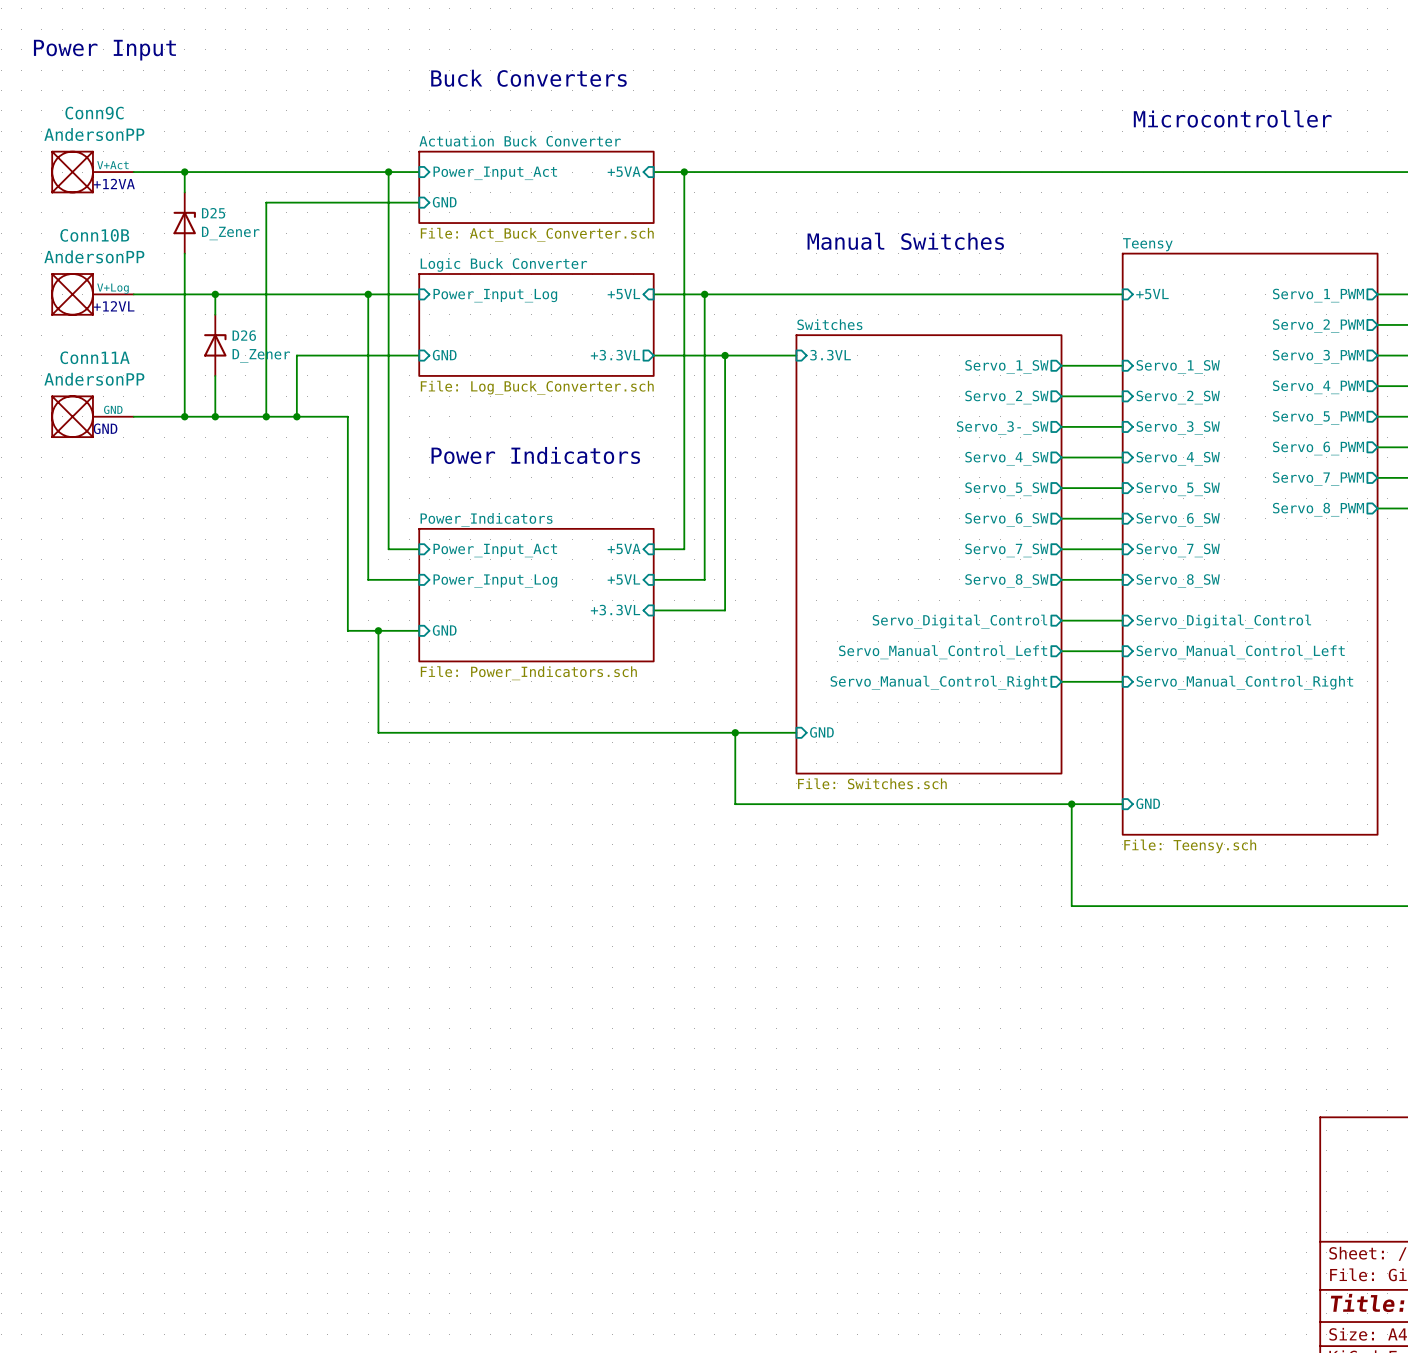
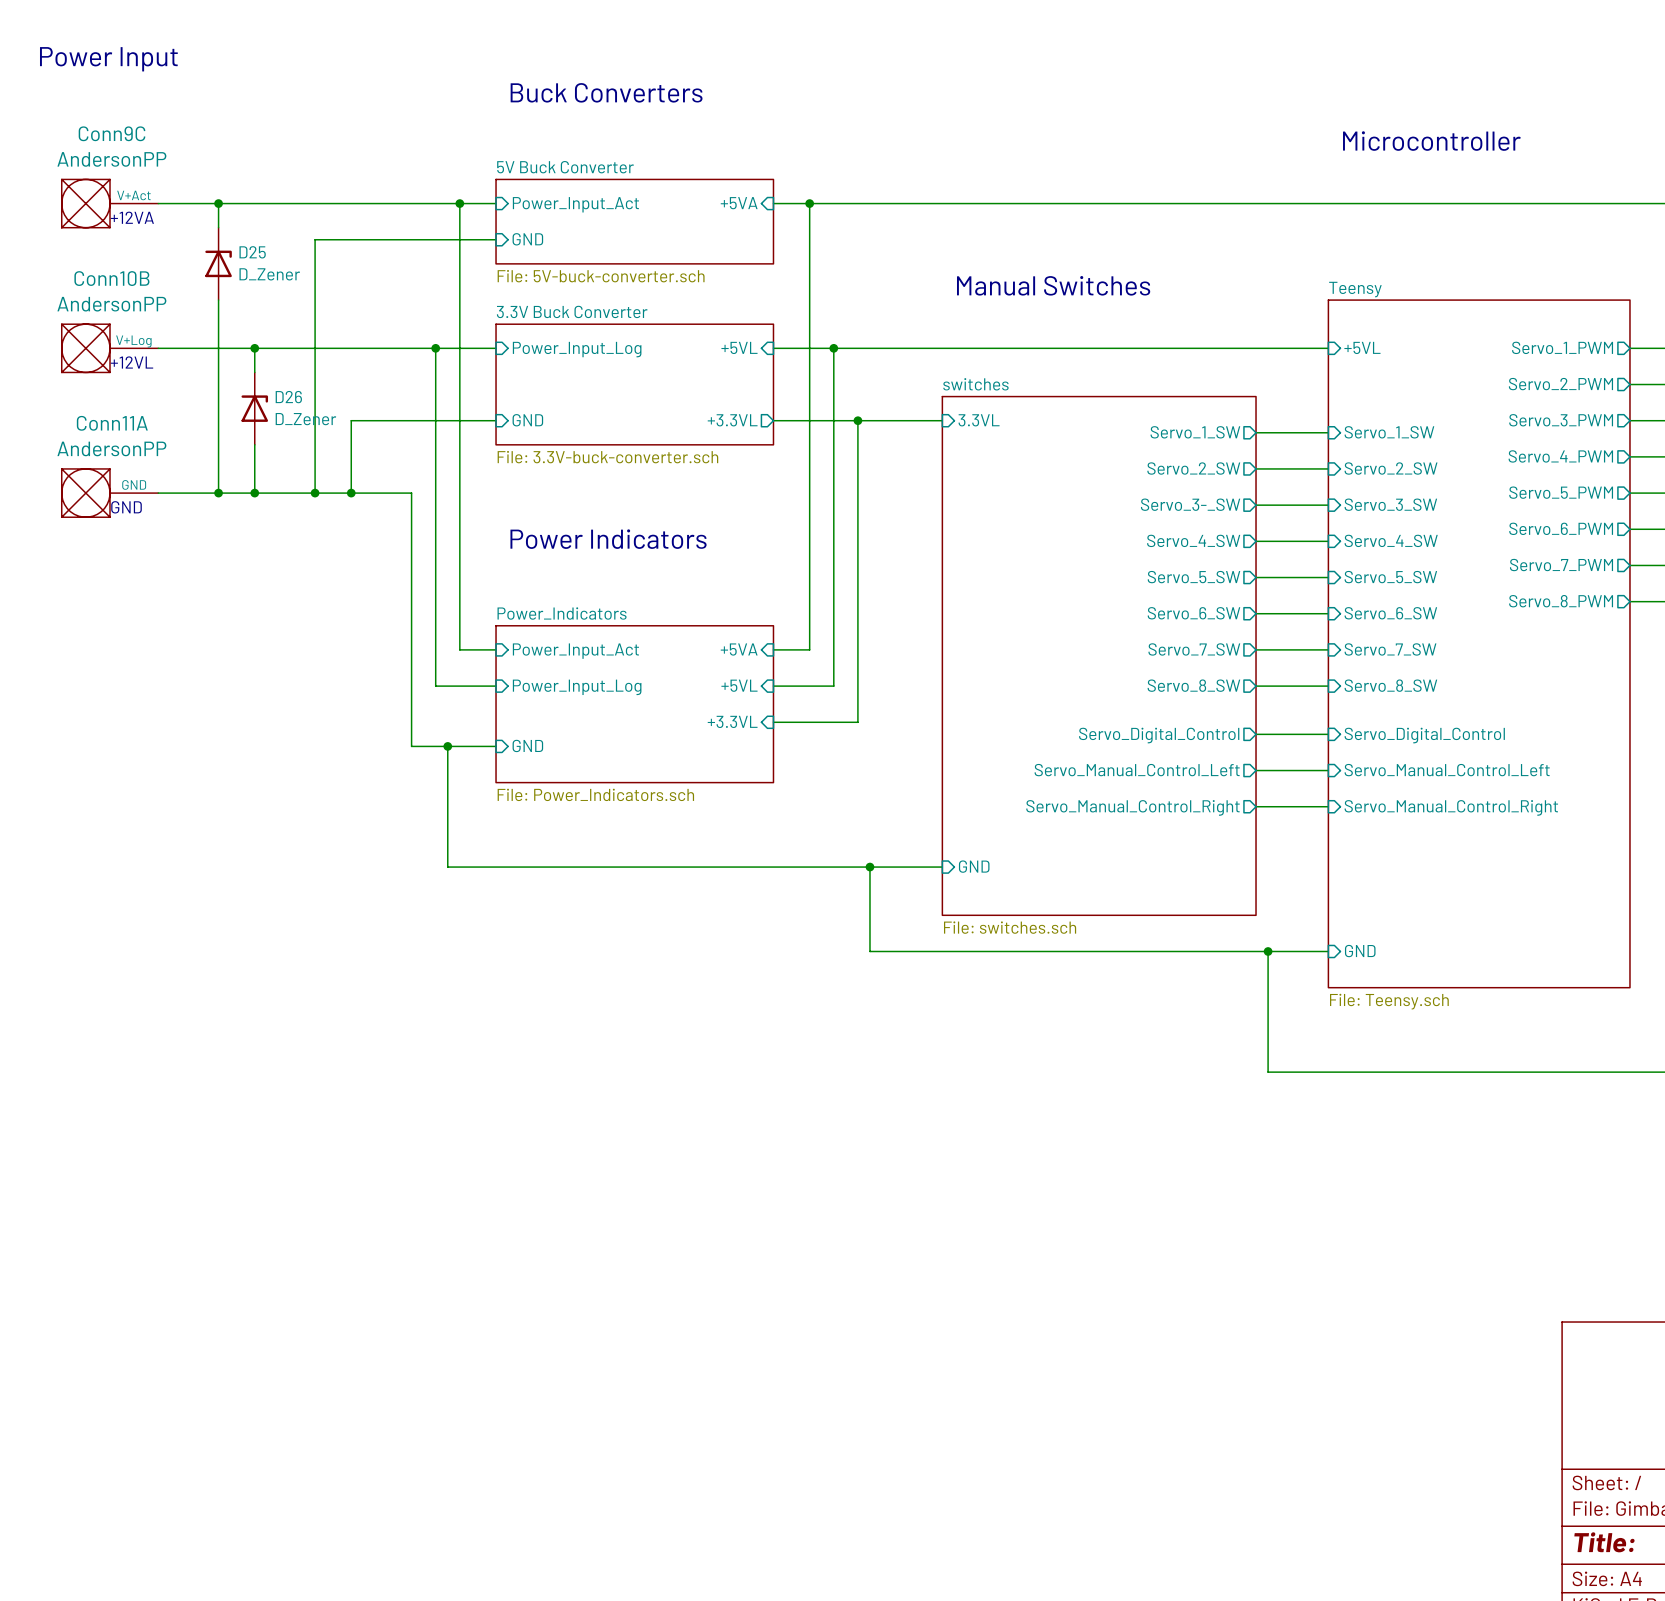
sheet Actuation Buck Converter name: Actuation Buck Converter (520, 141) -> 5V Buck Converter (565, 167)
sheet Actuation Buck Converter value: File: Act_Buck_Converter.sch (537, 234) -> File: 5V-buck-converter.sch (601, 276)
sheet Logic Buck Converter name: Logic Buck Converter (503, 264) -> 3.3V Buck Converter (572, 311)
sheet Switches name: Switches (829, 324) -> switches (975, 384)
sheet Logic Buck Converter value: File: Log_Buck_Converter.sch (537, 387) -> File: 3.3V-buck-converter.sch (607, 457)
sheet Switches value: File: Switches.sch (872, 783) -> File: switches.sch (1010, 927)

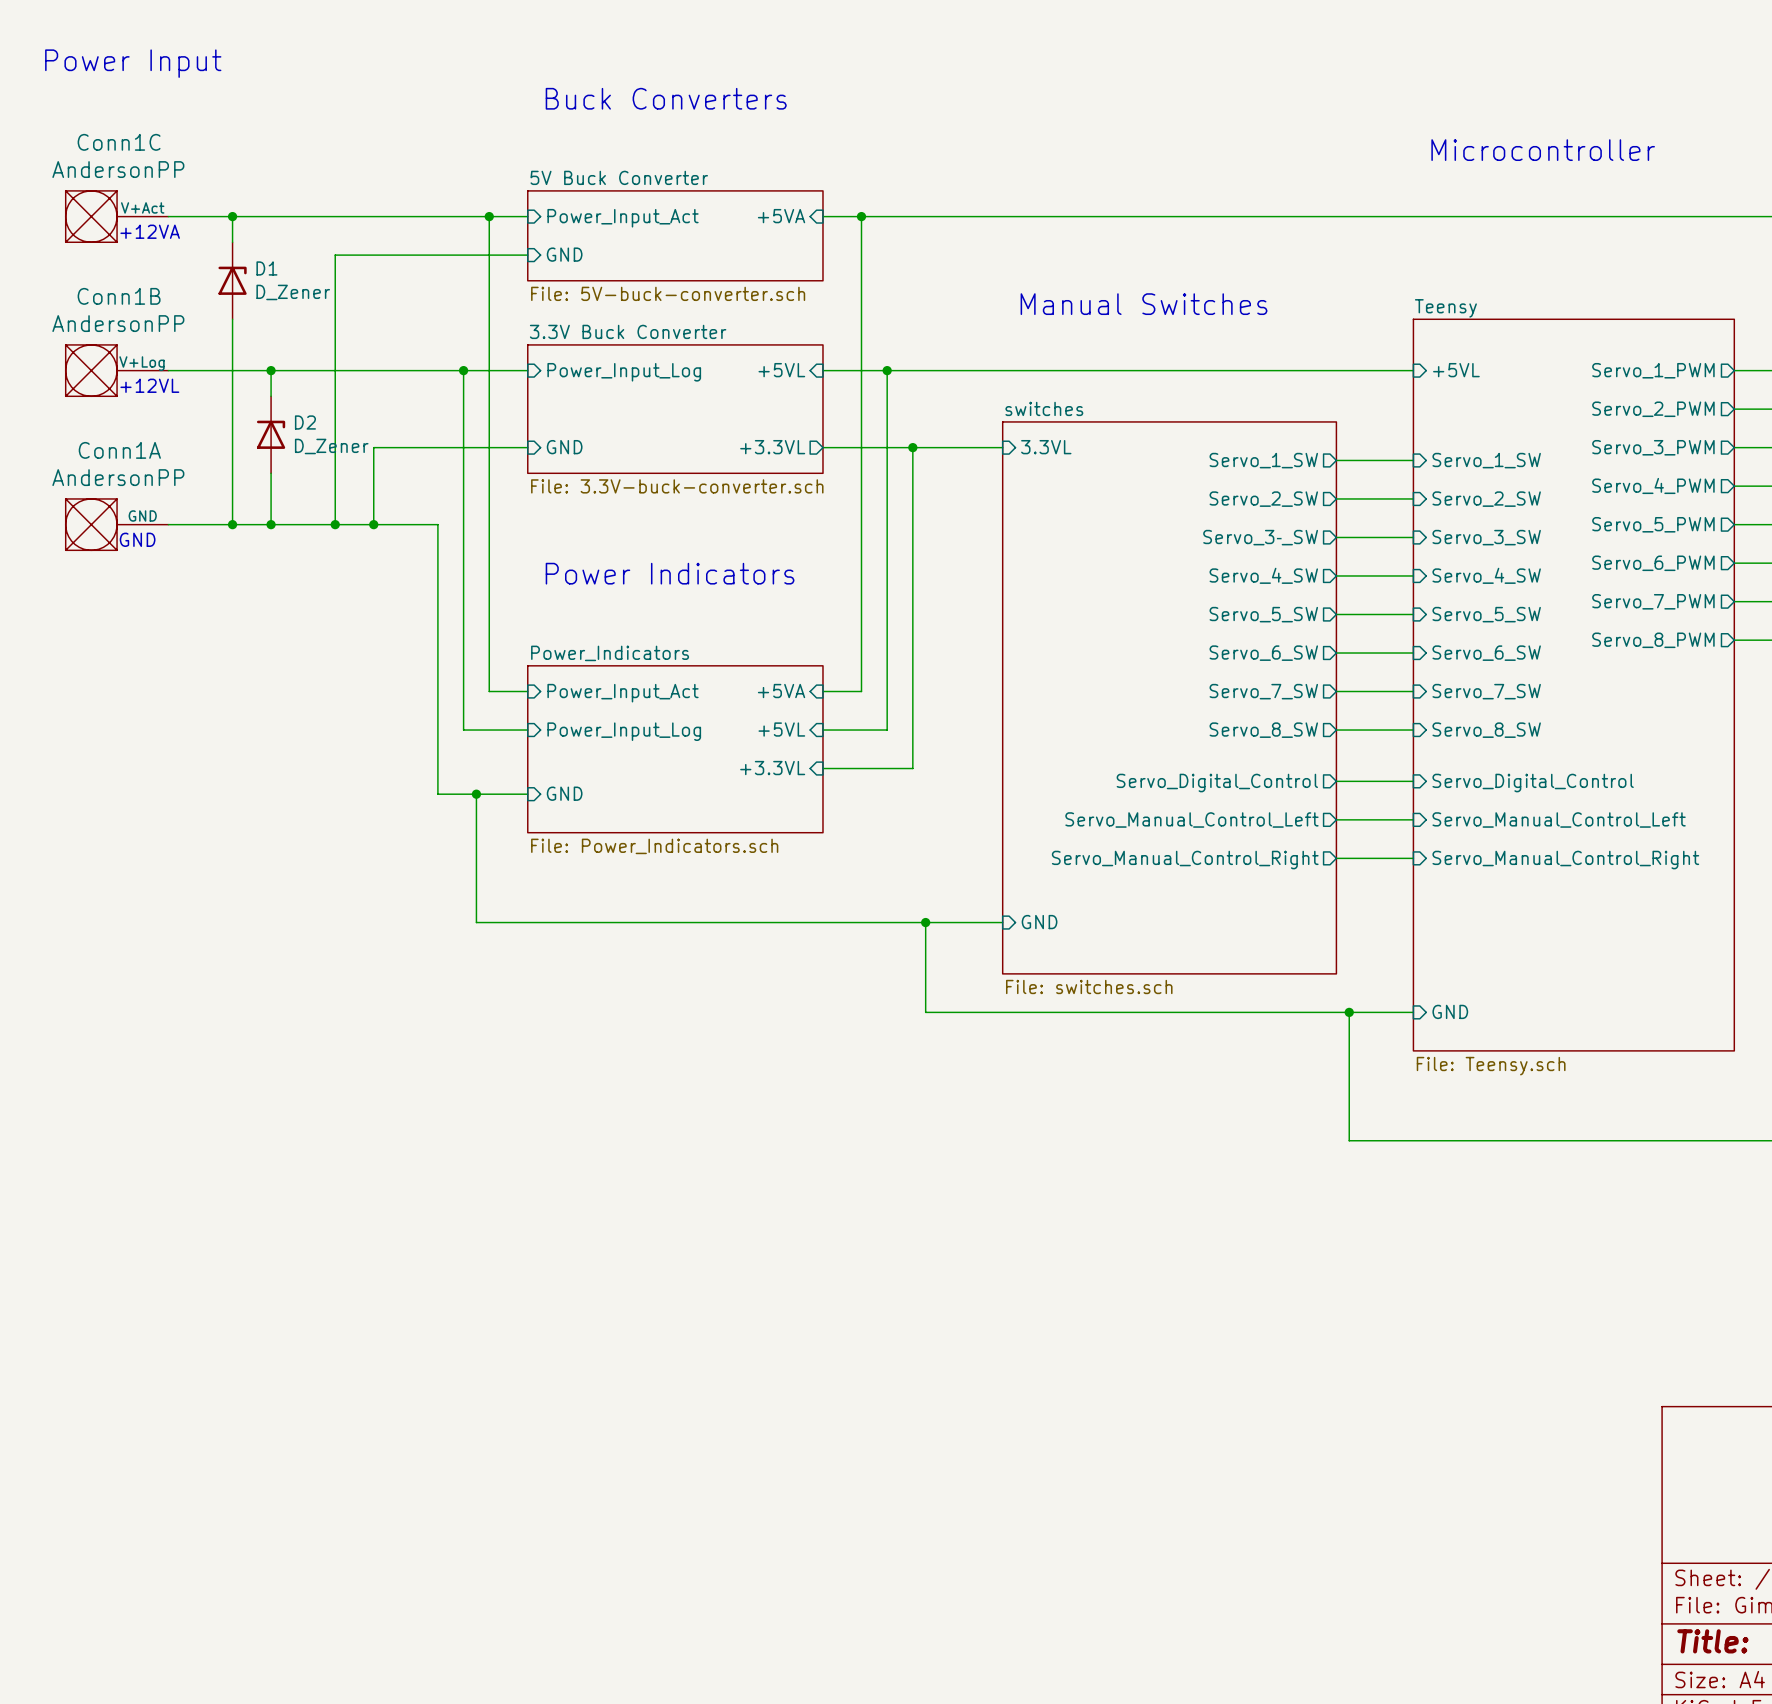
Conn9C name: Conn9C (112, 133) -> Conn1C (119, 142)
D25 name: D25 (252, 252) -> D1 (266, 268)
Conn10B name: Conn10B (111, 278) -> Conn1B (119, 296)
D26 name: D26 (288, 397) -> D2 (305, 422)
Conn11A name: Conn11A (112, 423) -> Conn1A (119, 450)

